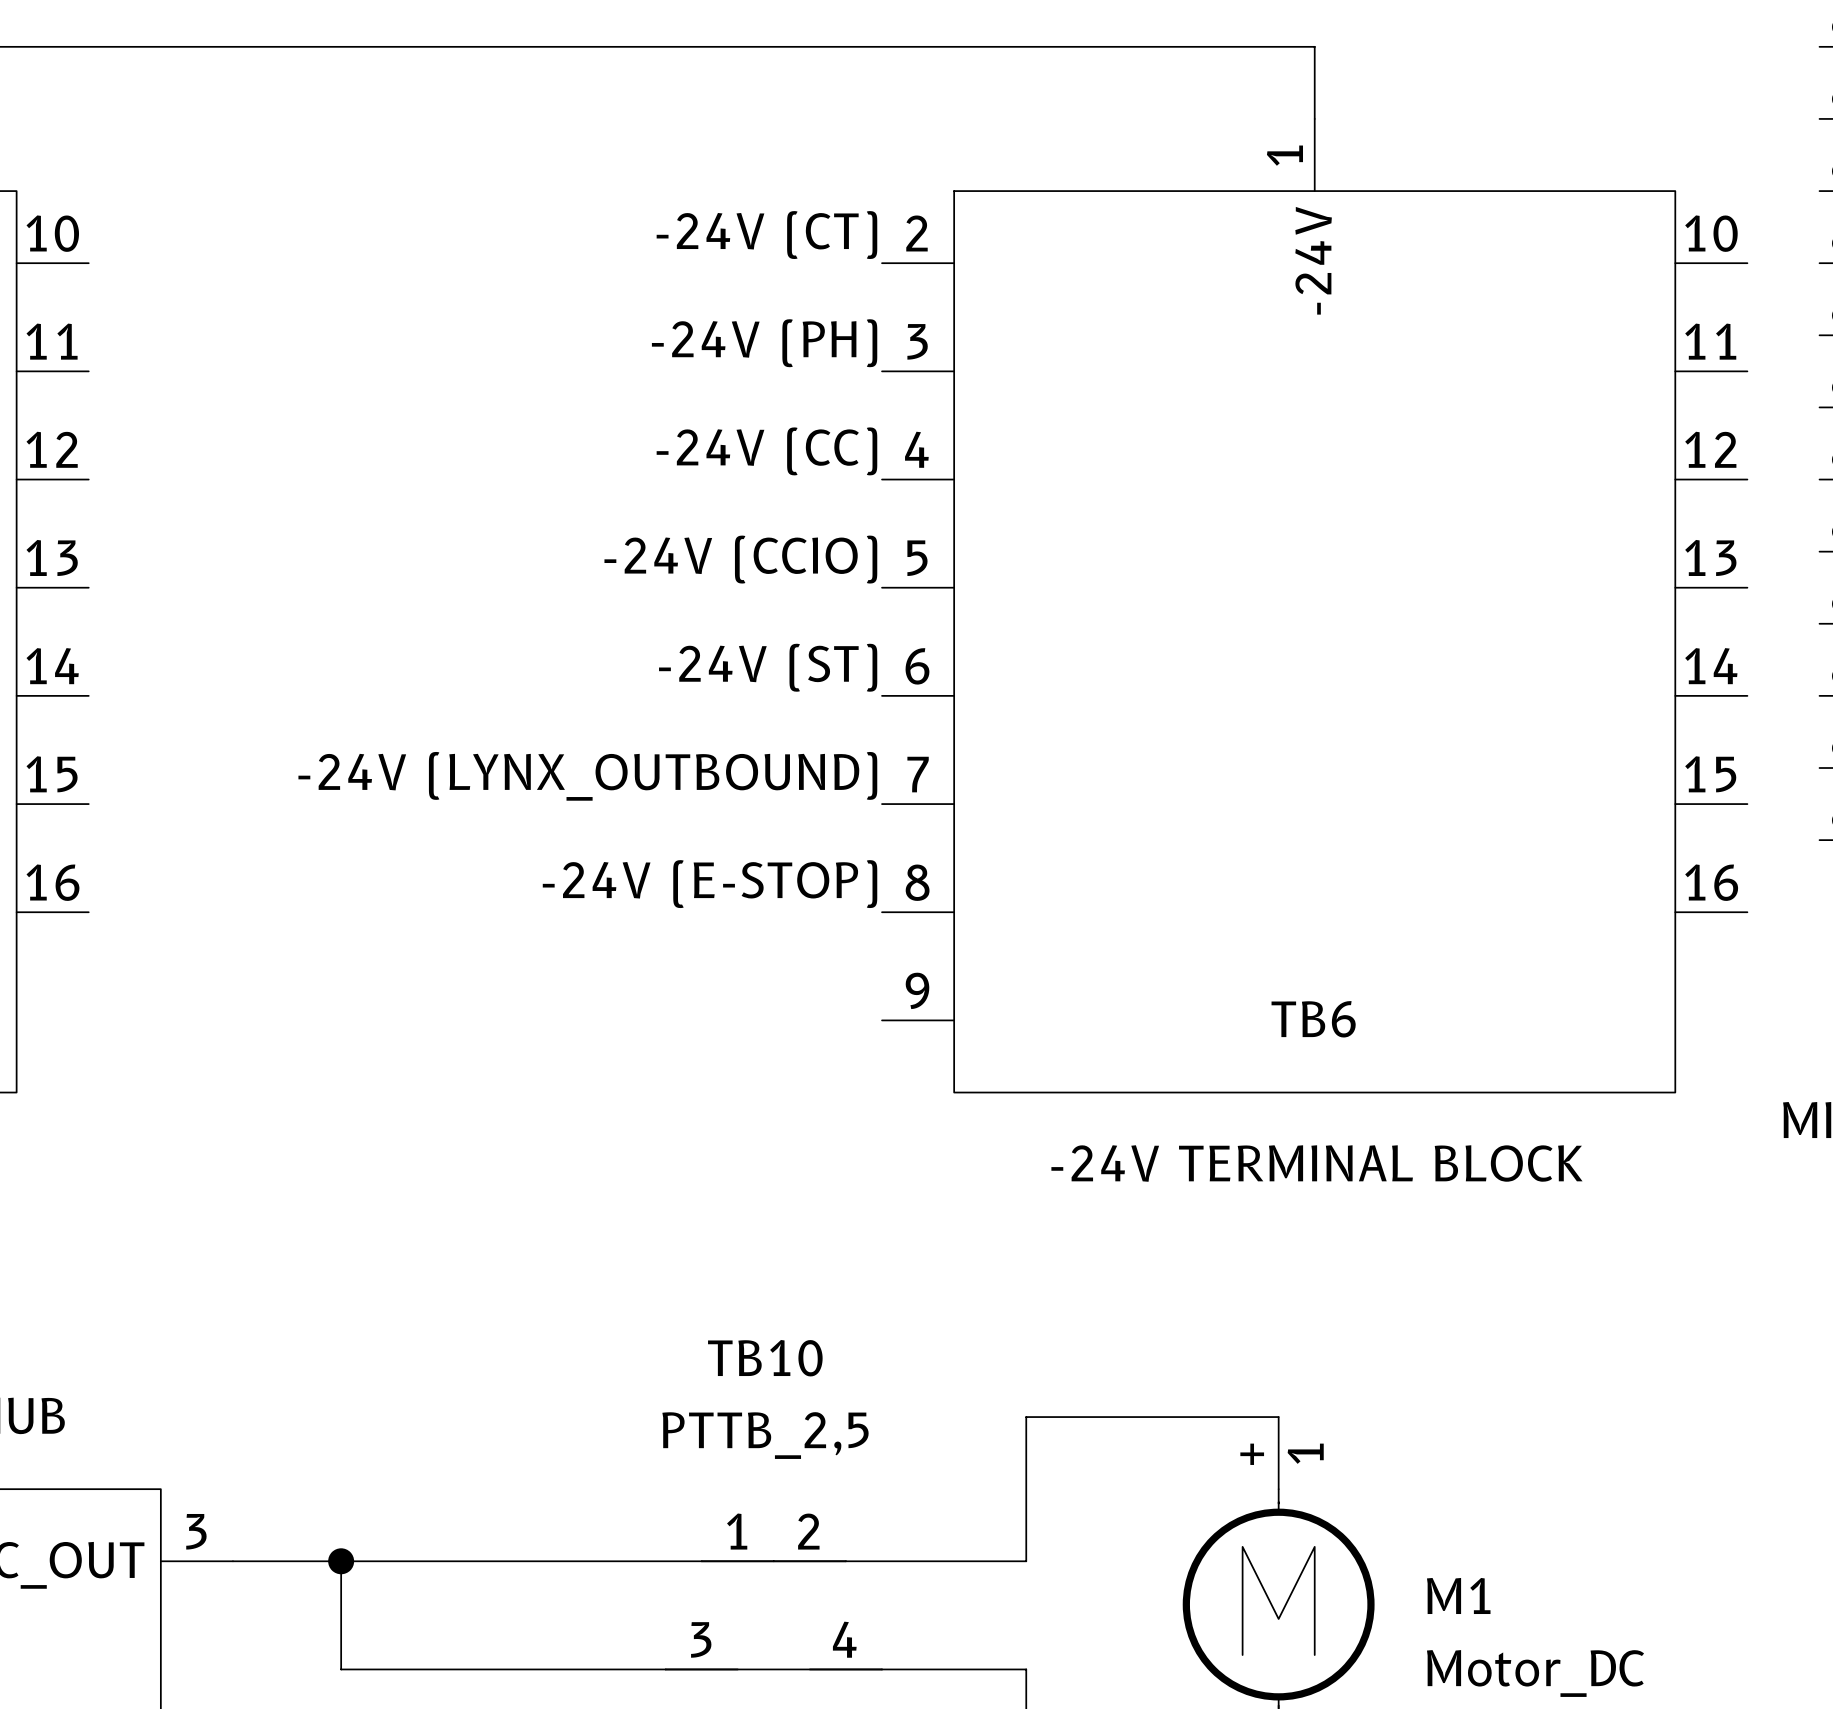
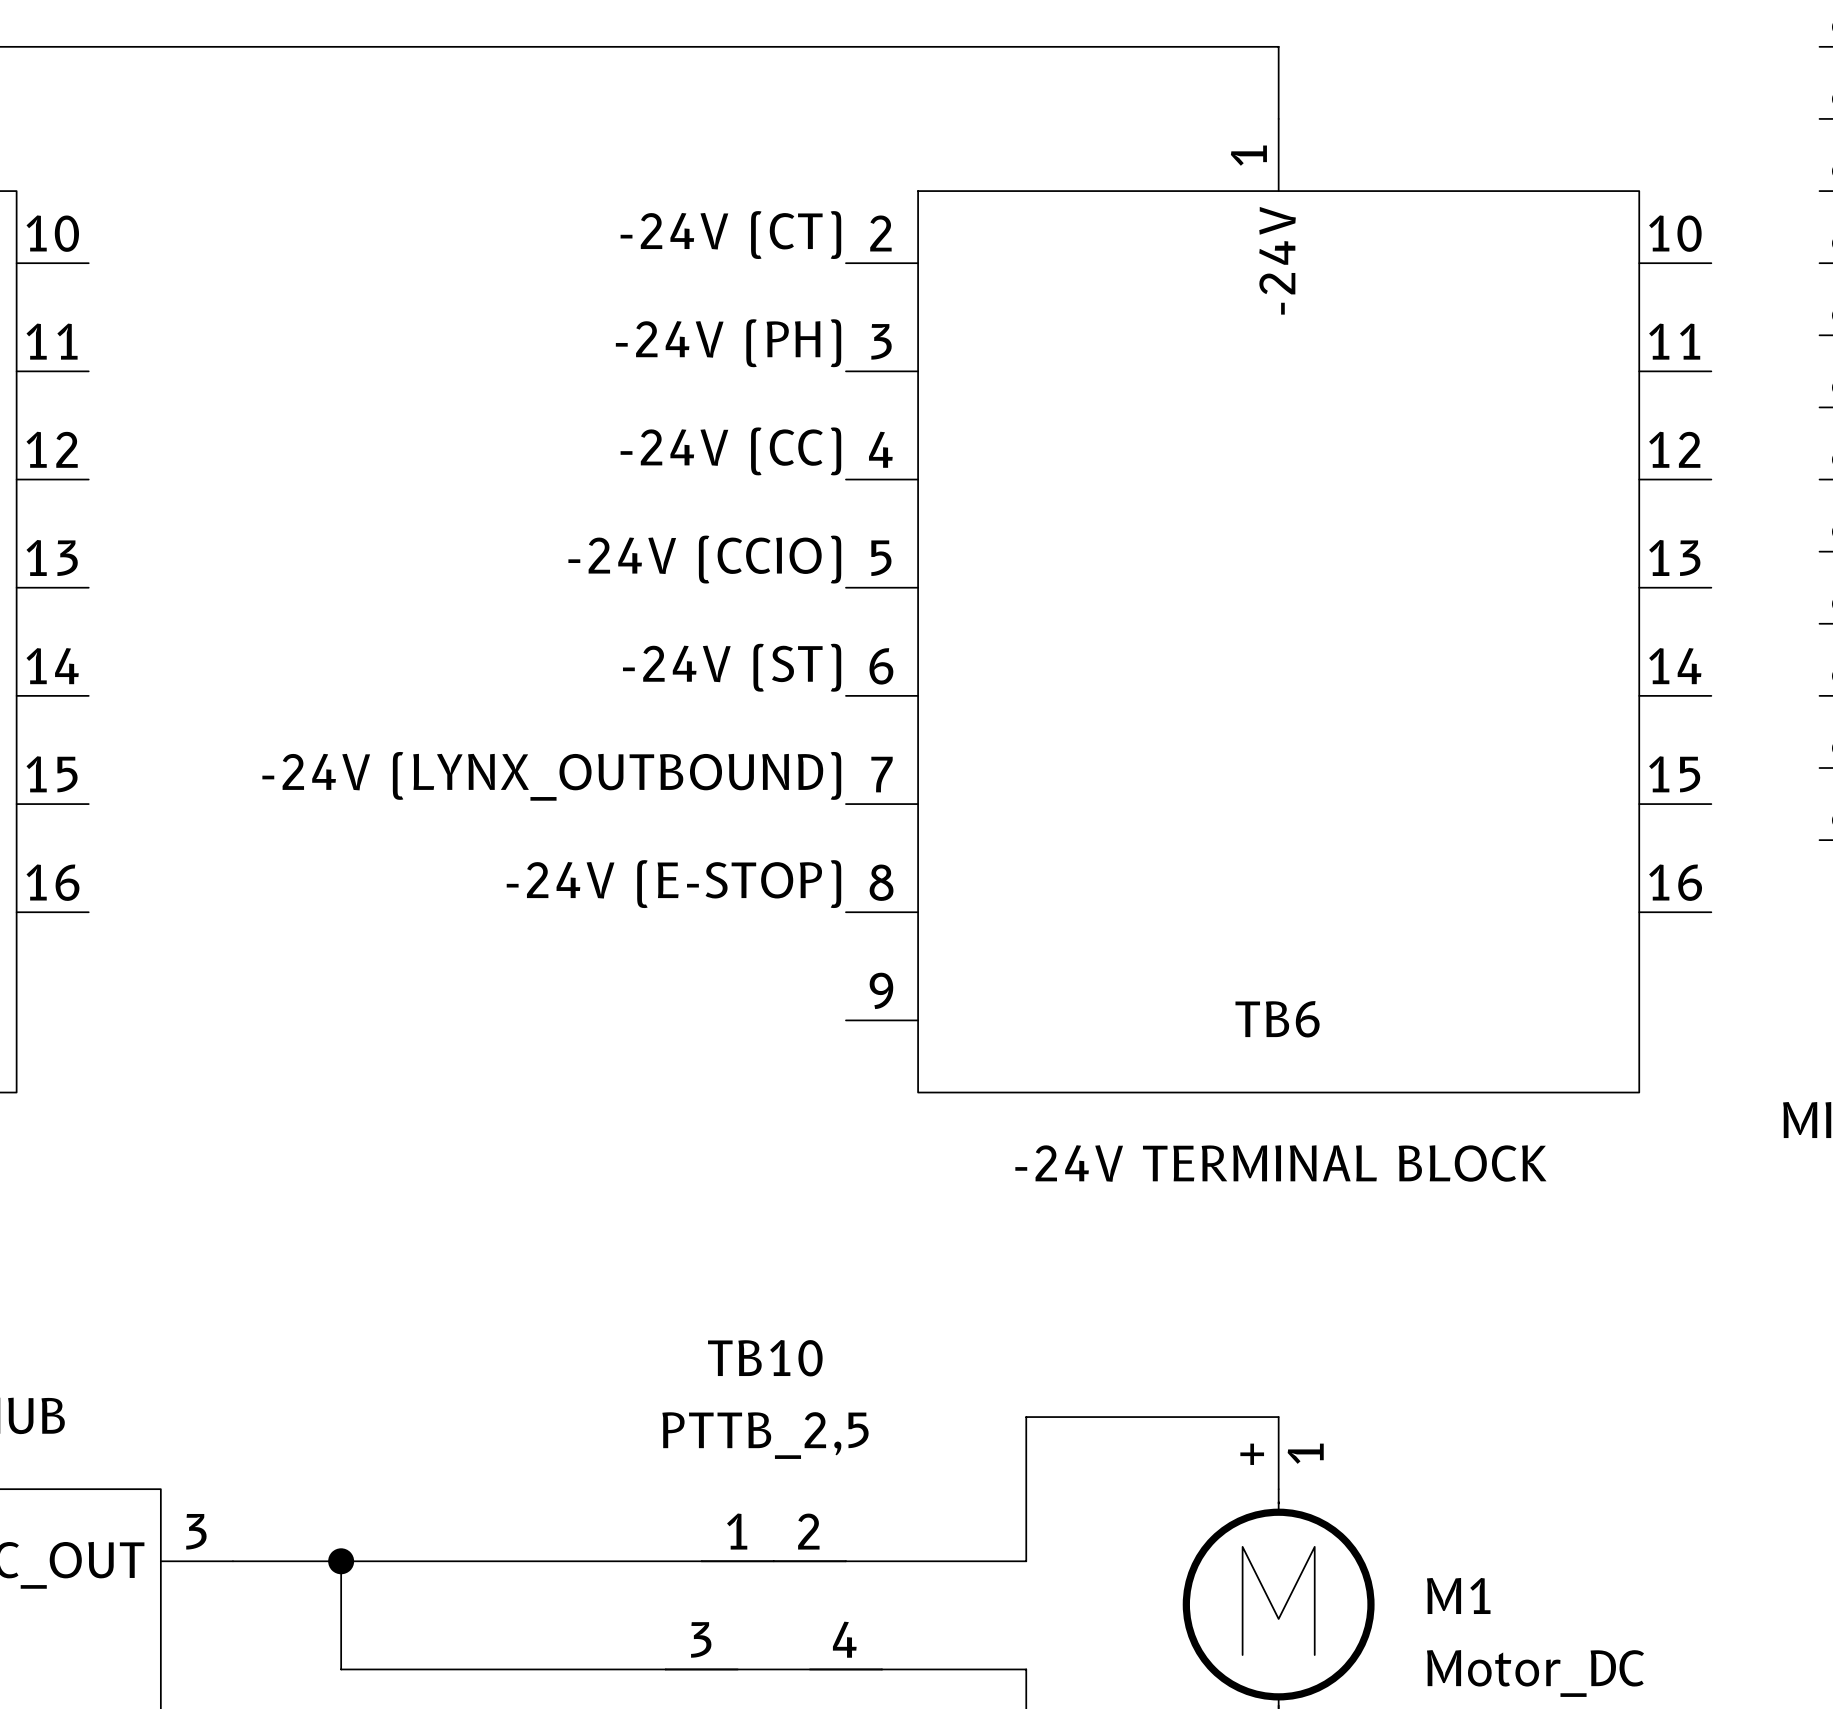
wire: (1278, 46) (1314, 46) (1314, 118) -> (1278, 46) (1278, 118)
label position: -24V (CT) (766, 235) -> -24V (CT) (730, 235)
label position: -24V (PH) (764, 343) -> -24V (PH) (728, 343)
label position: -24V (CC) (766, 451) -> -24V (CC) (730, 451)
label position: -24V (CCIO) (740, 559) -> -24V (CCIO) (704, 559)
TB6 position: (1314, 605) -> (1278, 605)
label position: -24V (ST) (768, 667) -> -24V (ST) (732, 667)
label position: -24V (LYNX_OUTBOUND) (587, 776) -> -24V (LYNX_OUTBOUND) (551, 776)
label position: -24V (E-STOP) (710, 884) -> -24V (E-STOP) (673, 884)

